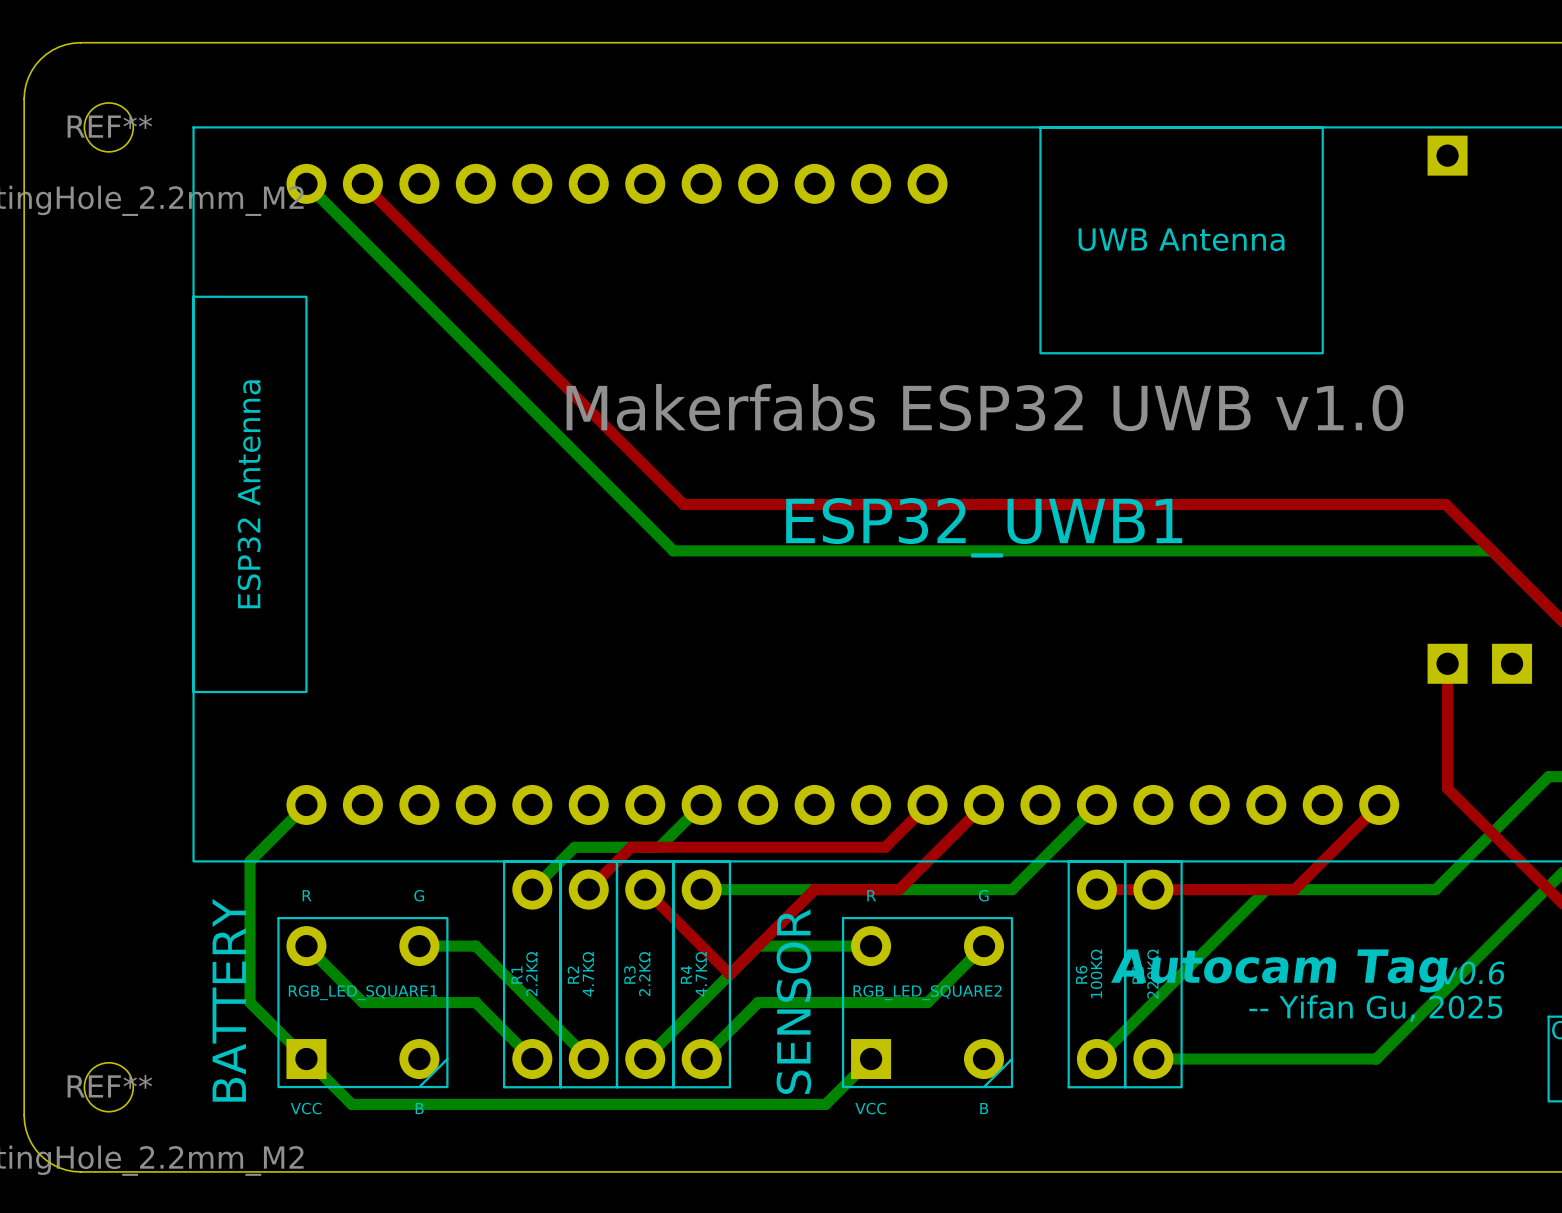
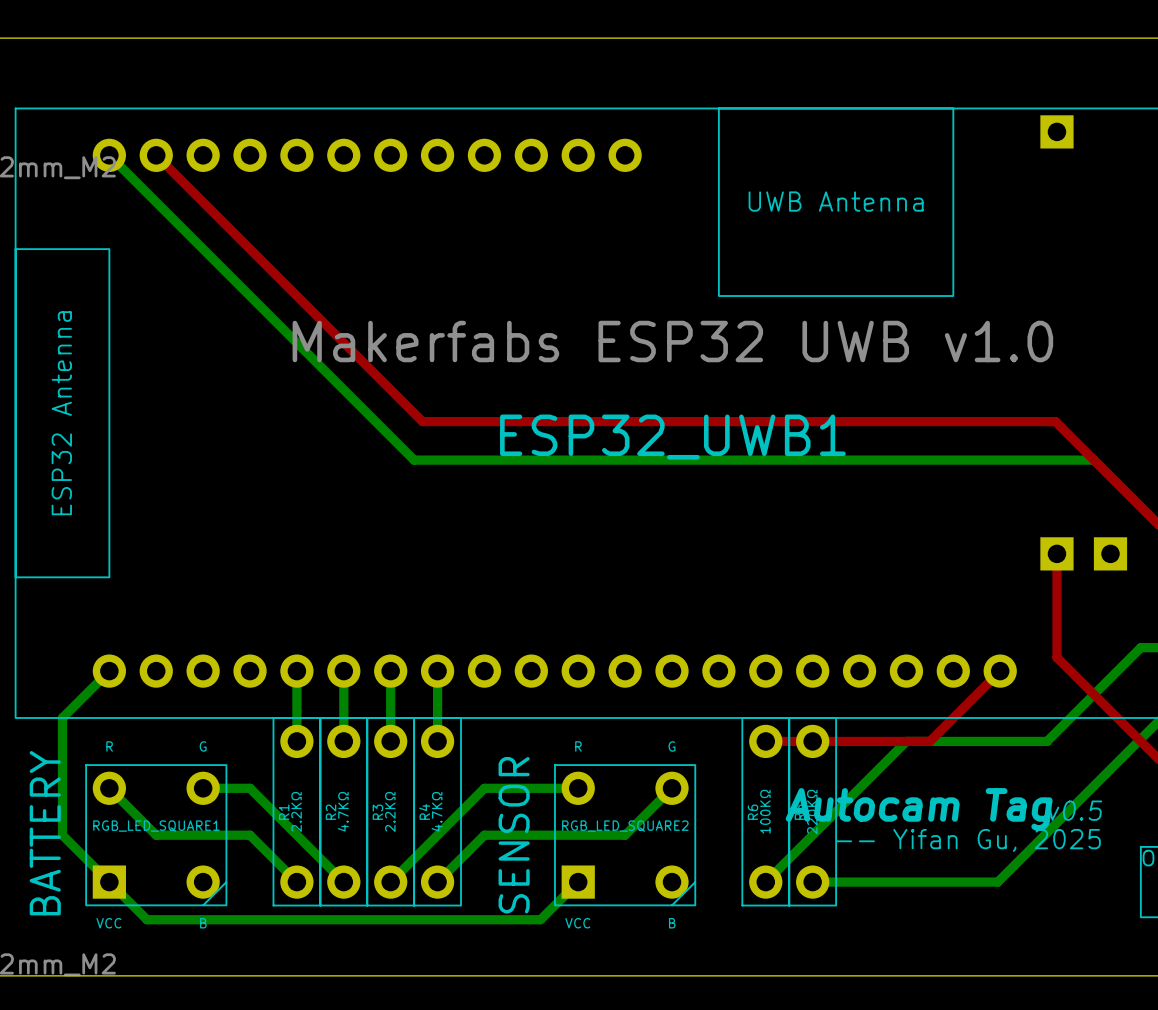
bottom track: none -> (343, 671) (343, 741)
bottom track: none -> (390, 671) (390, 741)
bottom track: (701, 804) (659, 847) (574, 847) (532, 889) -> (296, 671) (296, 741)
top track: (927, 804) (885, 847) (631, 847) (588, 889) -> none
top track: (983, 804) (899, 889) (814, 889) (729, 974) (645, 889) -> none
bottom track: (1096, 804) (1012, 889) (701, 889) -> (437, 671) (437, 741)
text: v0.6 (1472, 973) -> v0.5 (1075, 810)

